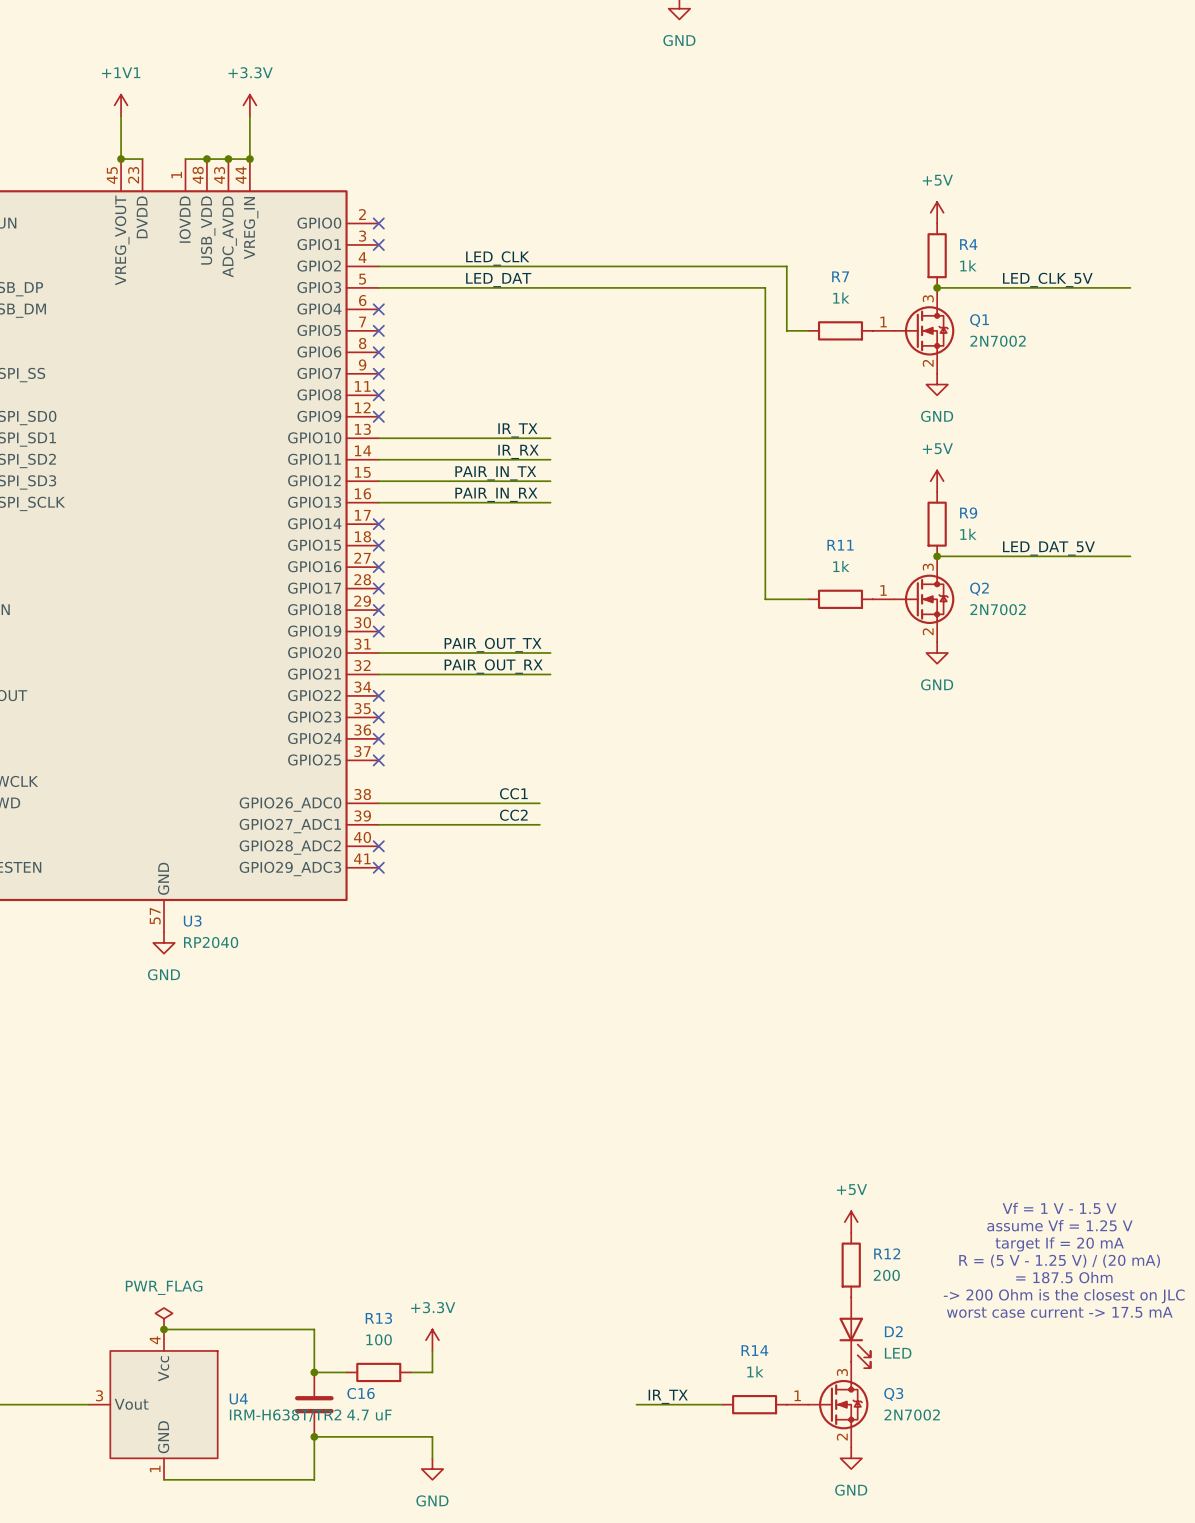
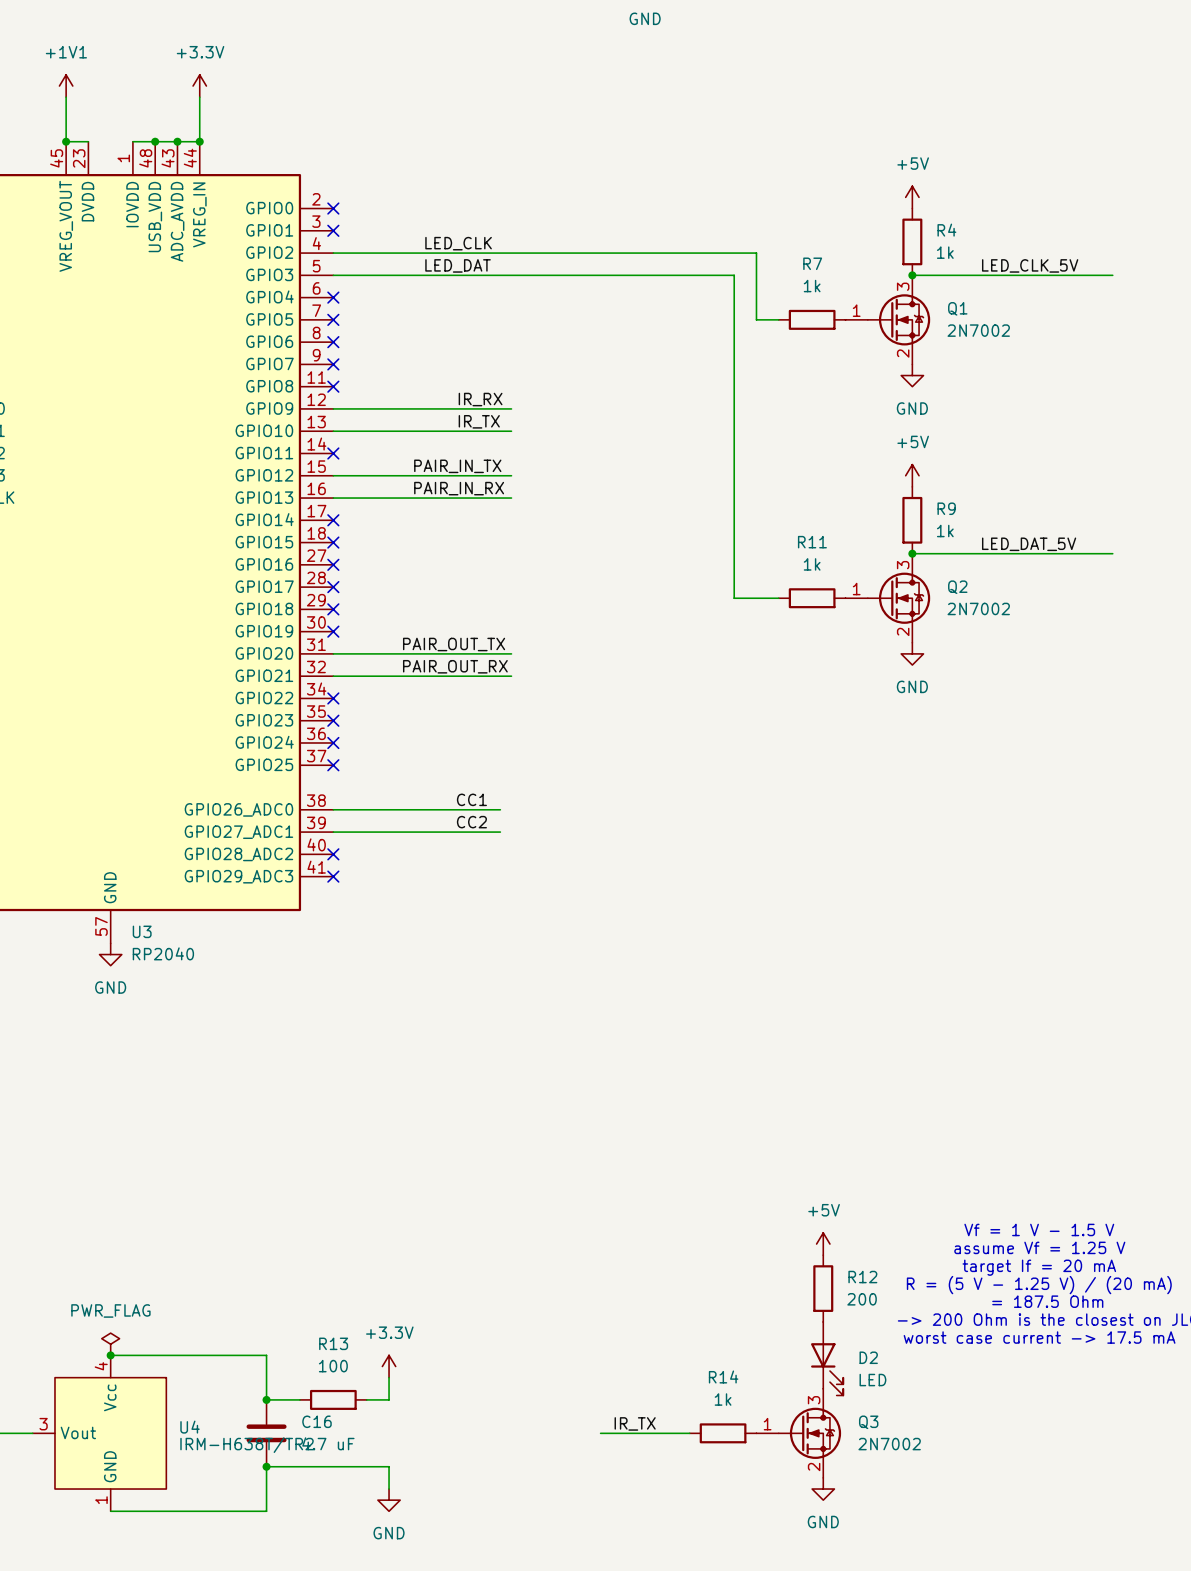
no-connect mark position: (378, 416) -> (333, 453)
label position: IR_RX (518, 451) -> IR_RX (480, 399)
wire: (378, 459) (550, 459) -> (333, 408) (511, 408)

